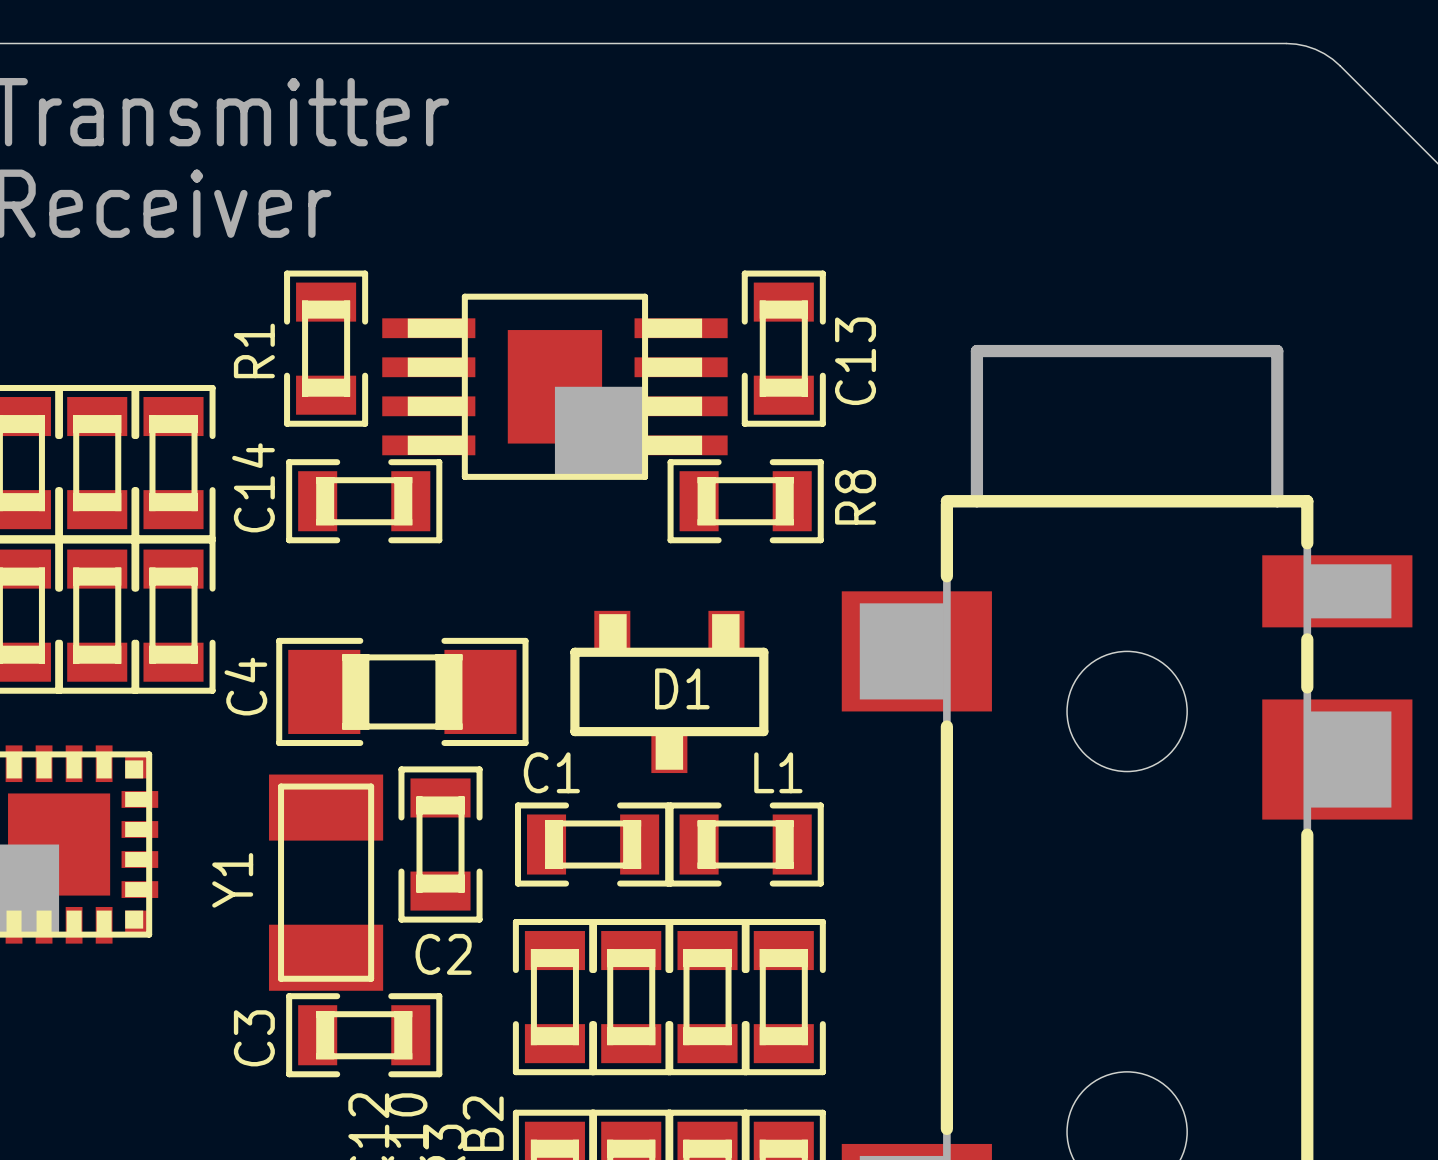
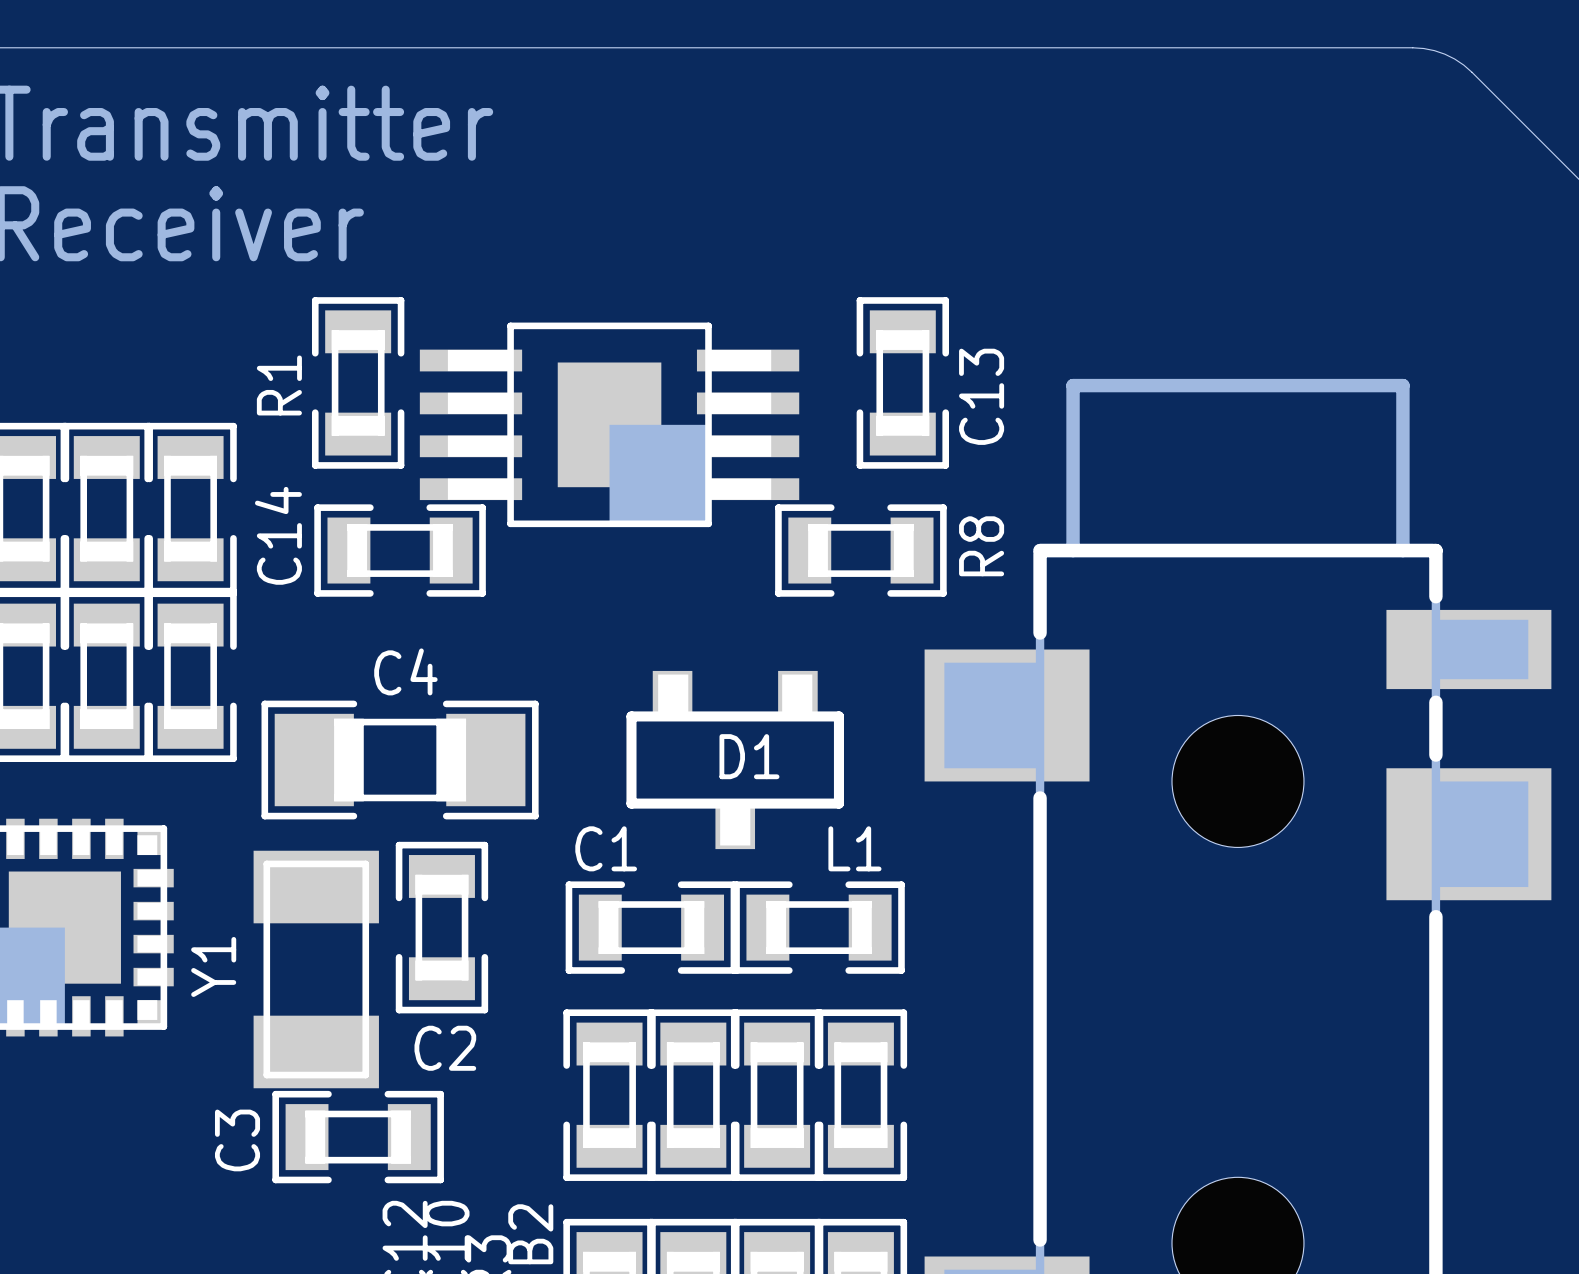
C13 position: (783, 348) -> (902, 382)
R8 position: (745, 501) -> (860, 550)
C4 name rotation: 0° (245, 686) -> 90° clockwise (405, 671)
C4 name position: C4 (245, 686) -> C4 (405, 671)
C4 position: (402, 691) -> (400, 760)
C2 position: (440, 844) -> (441, 927)
Y1 position: (326, 882) -> (316, 969)
C3 position: (364, 1035) -> (358, 1137)

